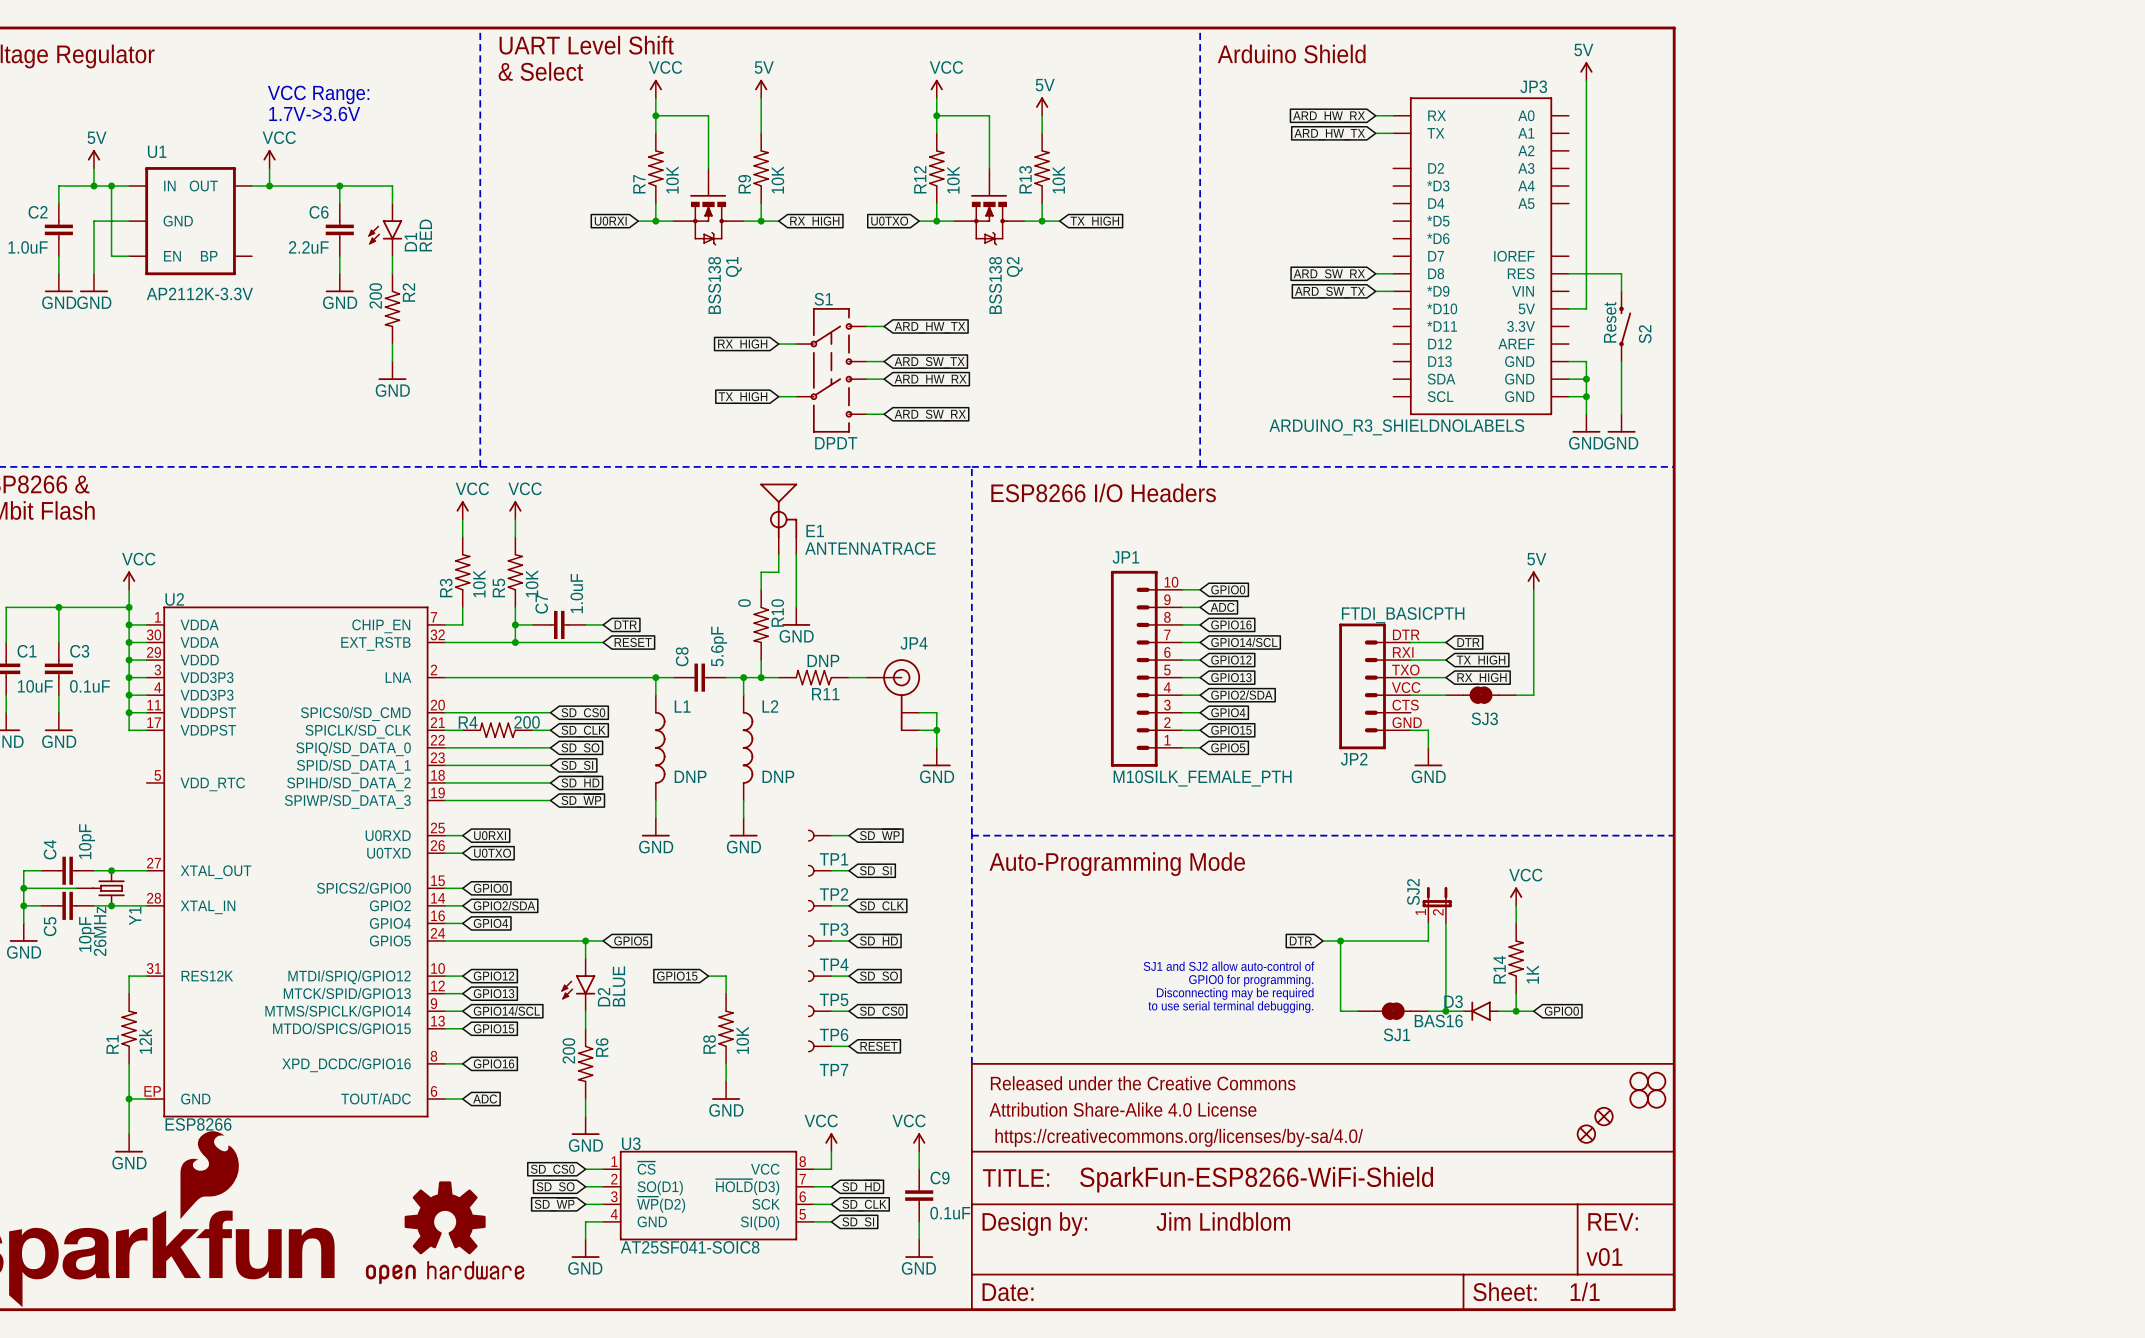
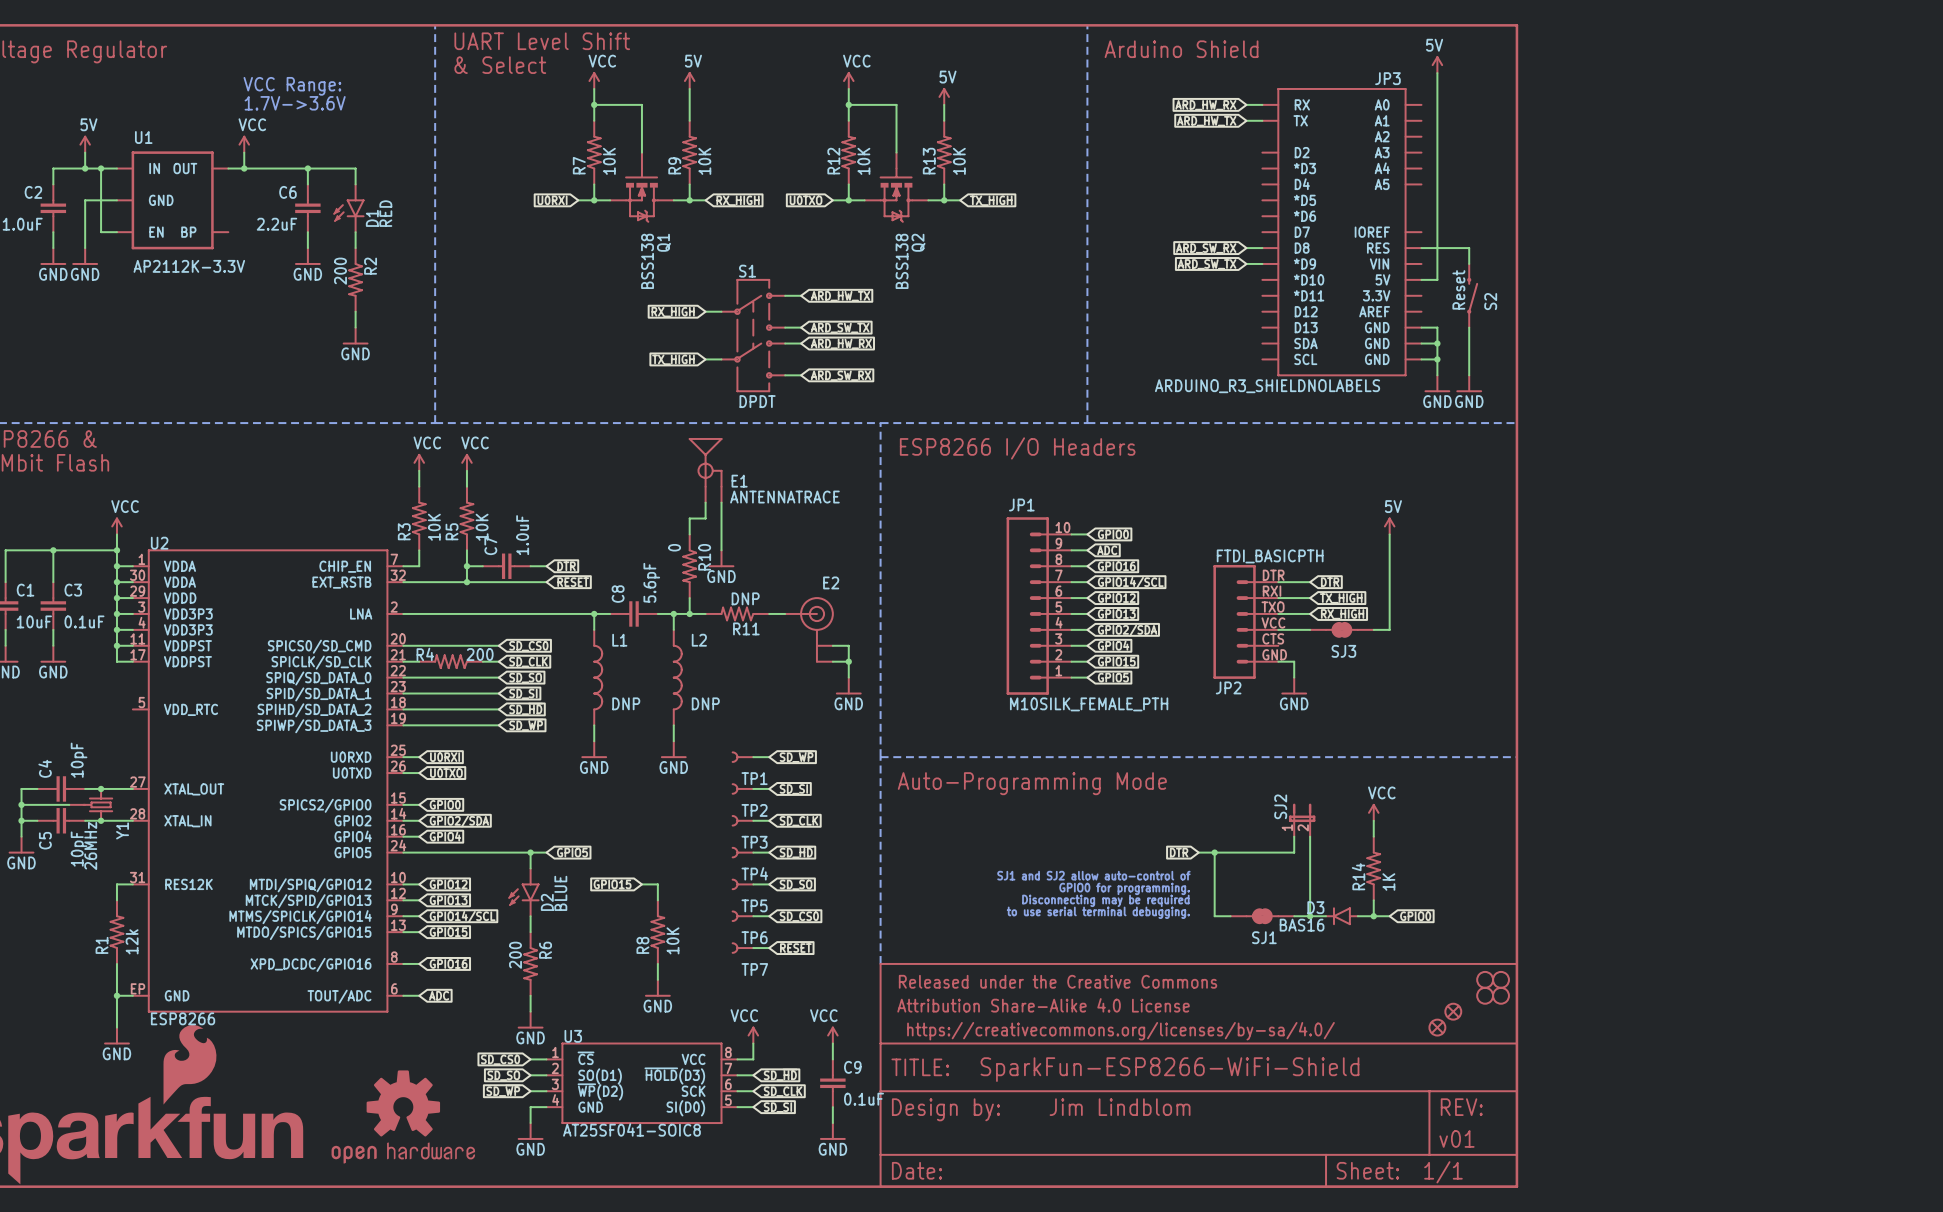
JP4 name: JP4 (914, 643) -> E2 (831, 582)

